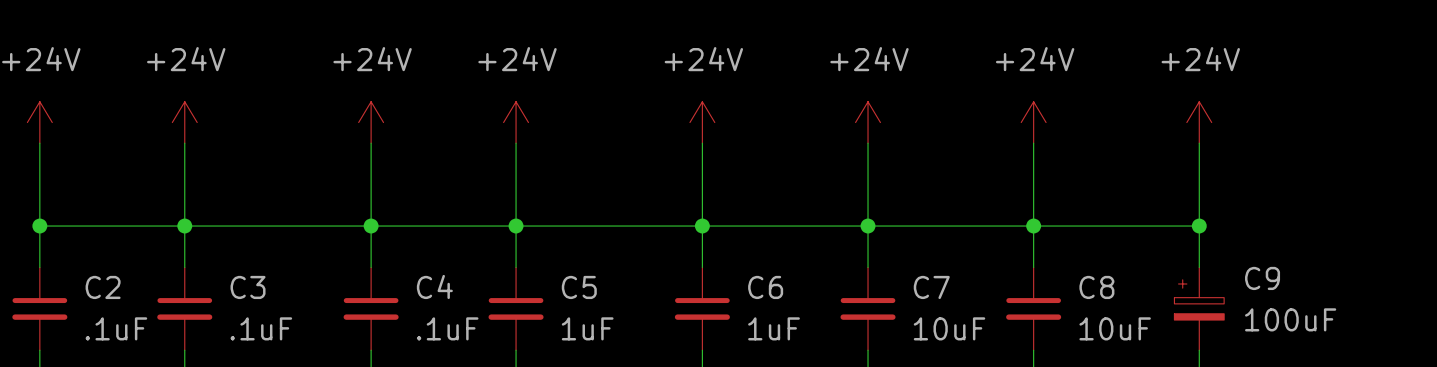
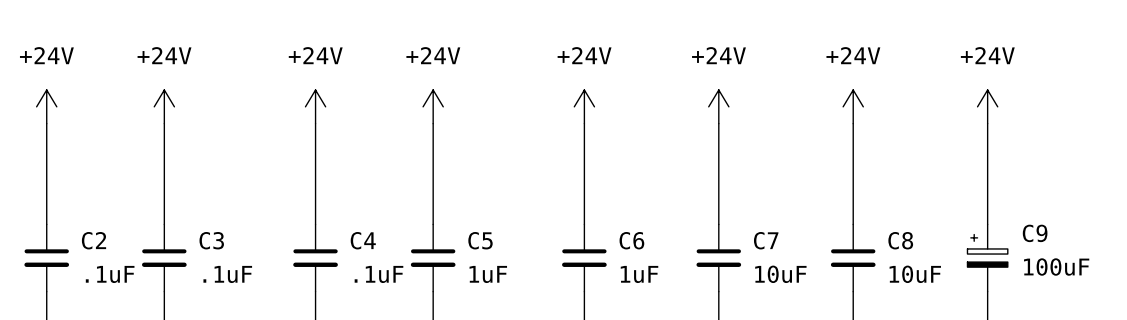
wire: (39, 226) (1199, 226) -> none
junction: (39, 226) -> none
junction: (184, 226) -> none
junction: (371, 226) -> none
junction: (516, 226) -> none
junction: (702, 226) -> none
junction: (868, 226) -> none
junction: (1033, 226) -> none
junction: (1199, 226) -> none

